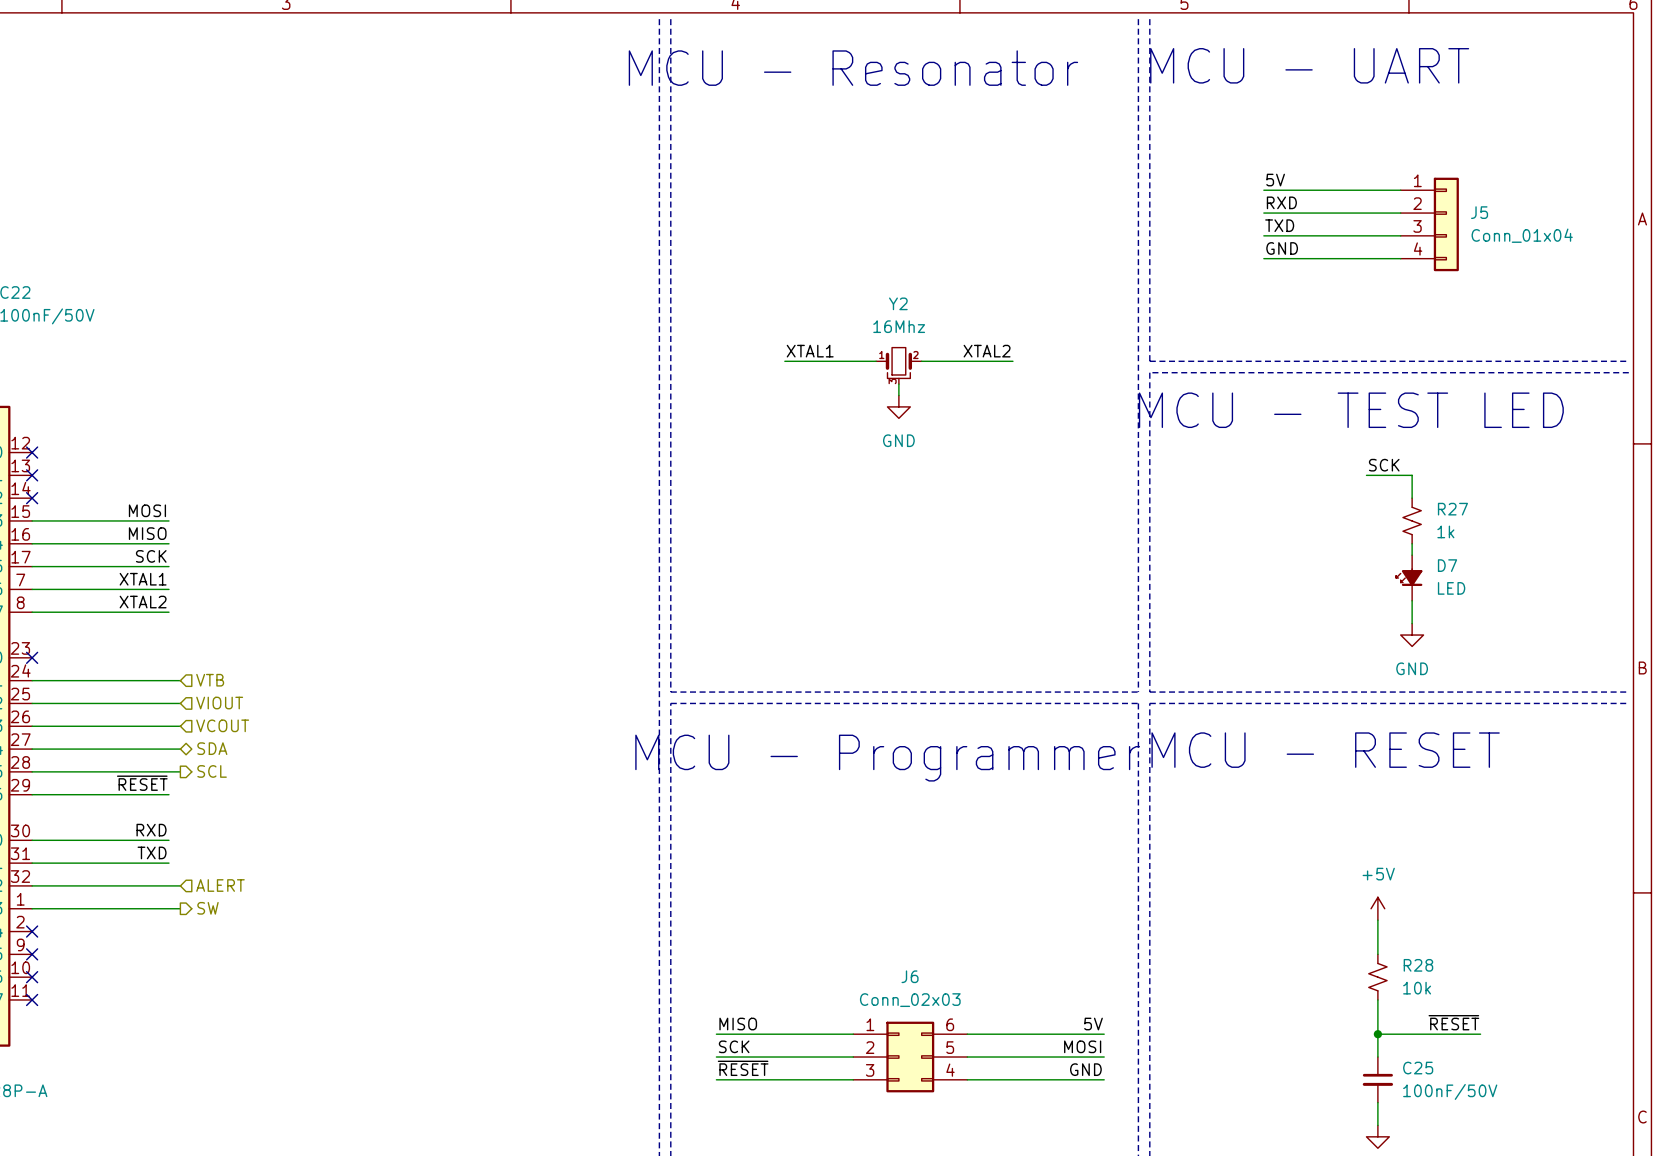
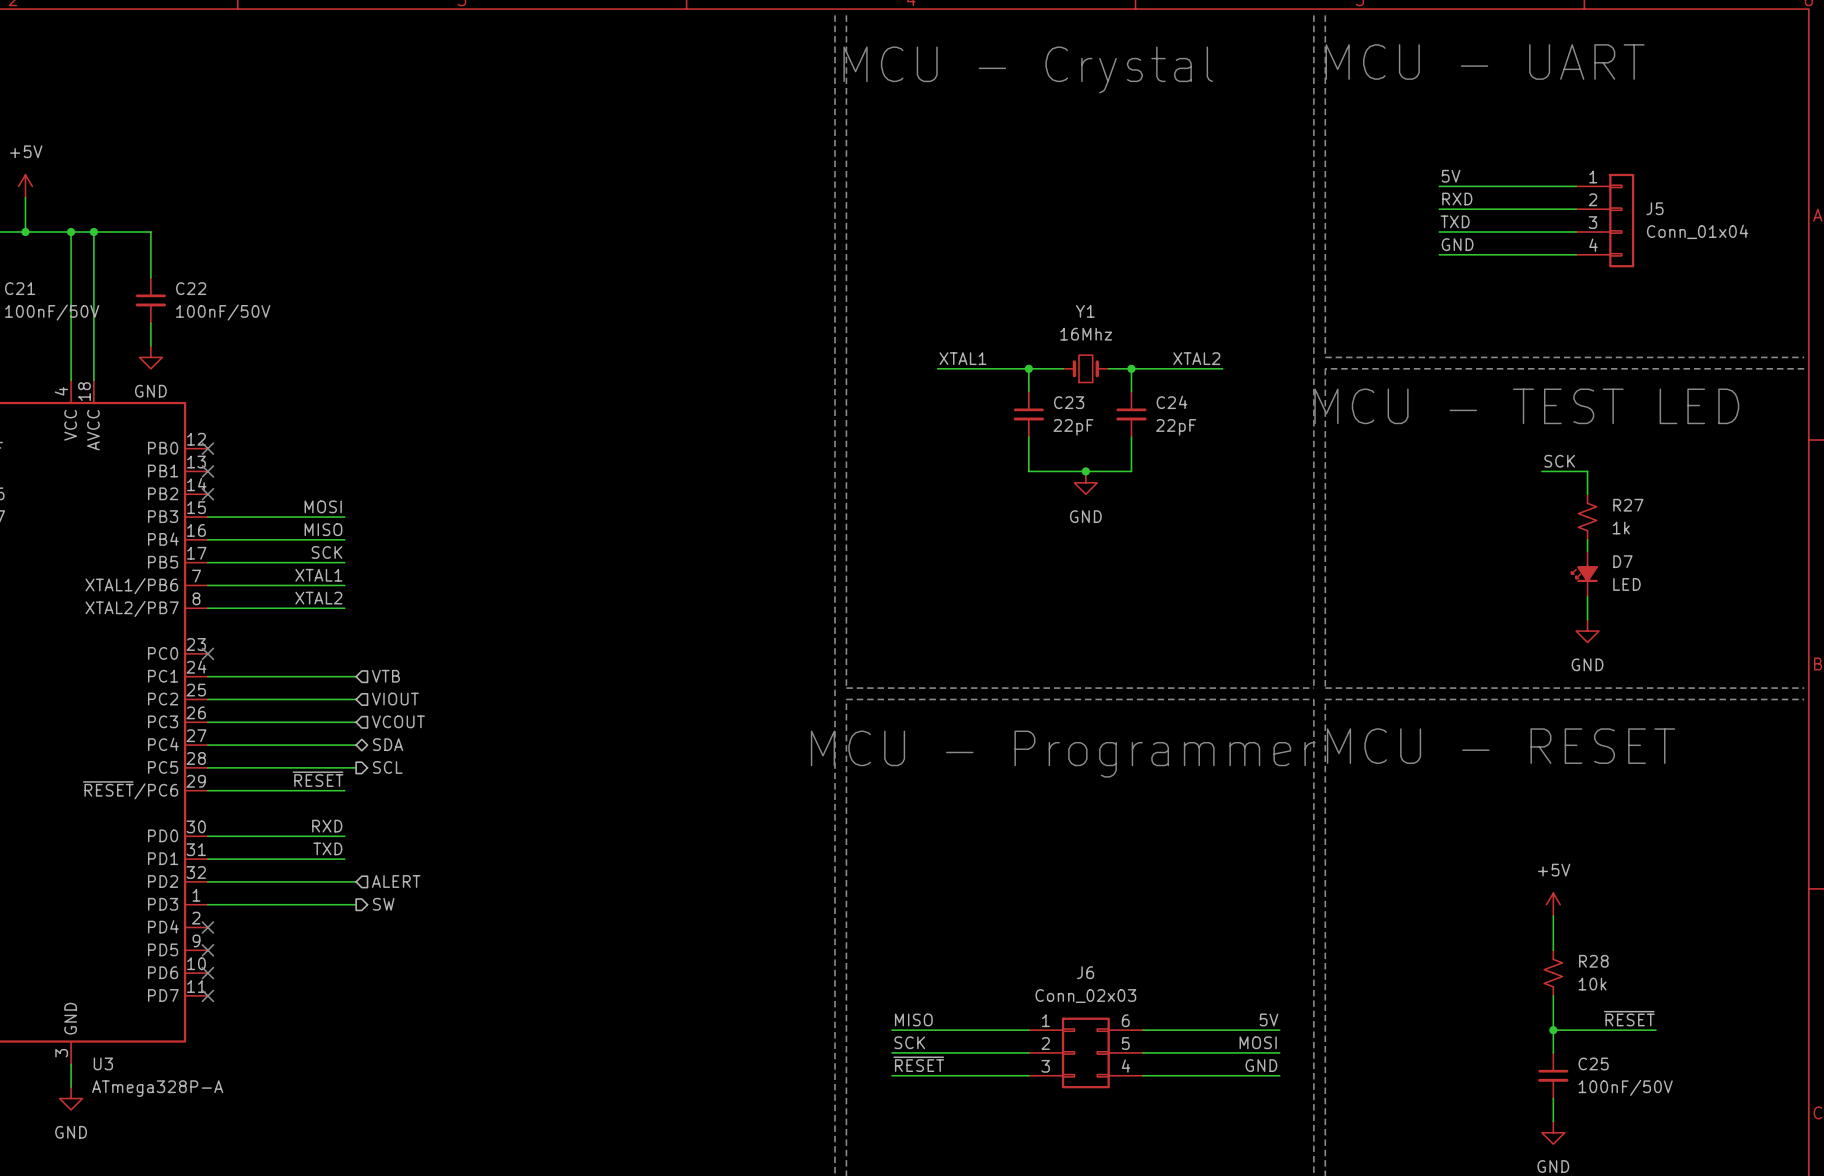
text: MCU - Resonator (853, 68) -> MCU - Crystal (1028, 69)
label position: XTAL1 (810, 351) -> XTAL1 (962, 358)
label position: XTAL2 (987, 351) -> XTAL2 (1196, 358)
wire: (784, 361) (876, 361) -> none
wire: (921, 361) (1012, 361) -> none
Y2: 16Mhz (898, 365) -> none
wire: none -> (937, 368) (1063, 368)
wire: none -> (1028, 368) (1028, 391)
junction: none -> (1028, 368)
Y1: none -> 16Mhz (1085, 368)
wire: none -> (1108, 368) (1222, 368)
wire: none -> (1131, 368) (1131, 391)
junction: none -> (1131, 368)
wire: (898, 384) (898, 395) -> none
power symbol position: GND (898, 406) -> GND (1085, 482)
C23: none -> 22pF (1028, 414)
C24: none -> 22pF (1131, 414)
wire: none -> (1028, 437) (1028, 471) (1131, 471) (1131, 437)
junction: none -> (1085, 471)

